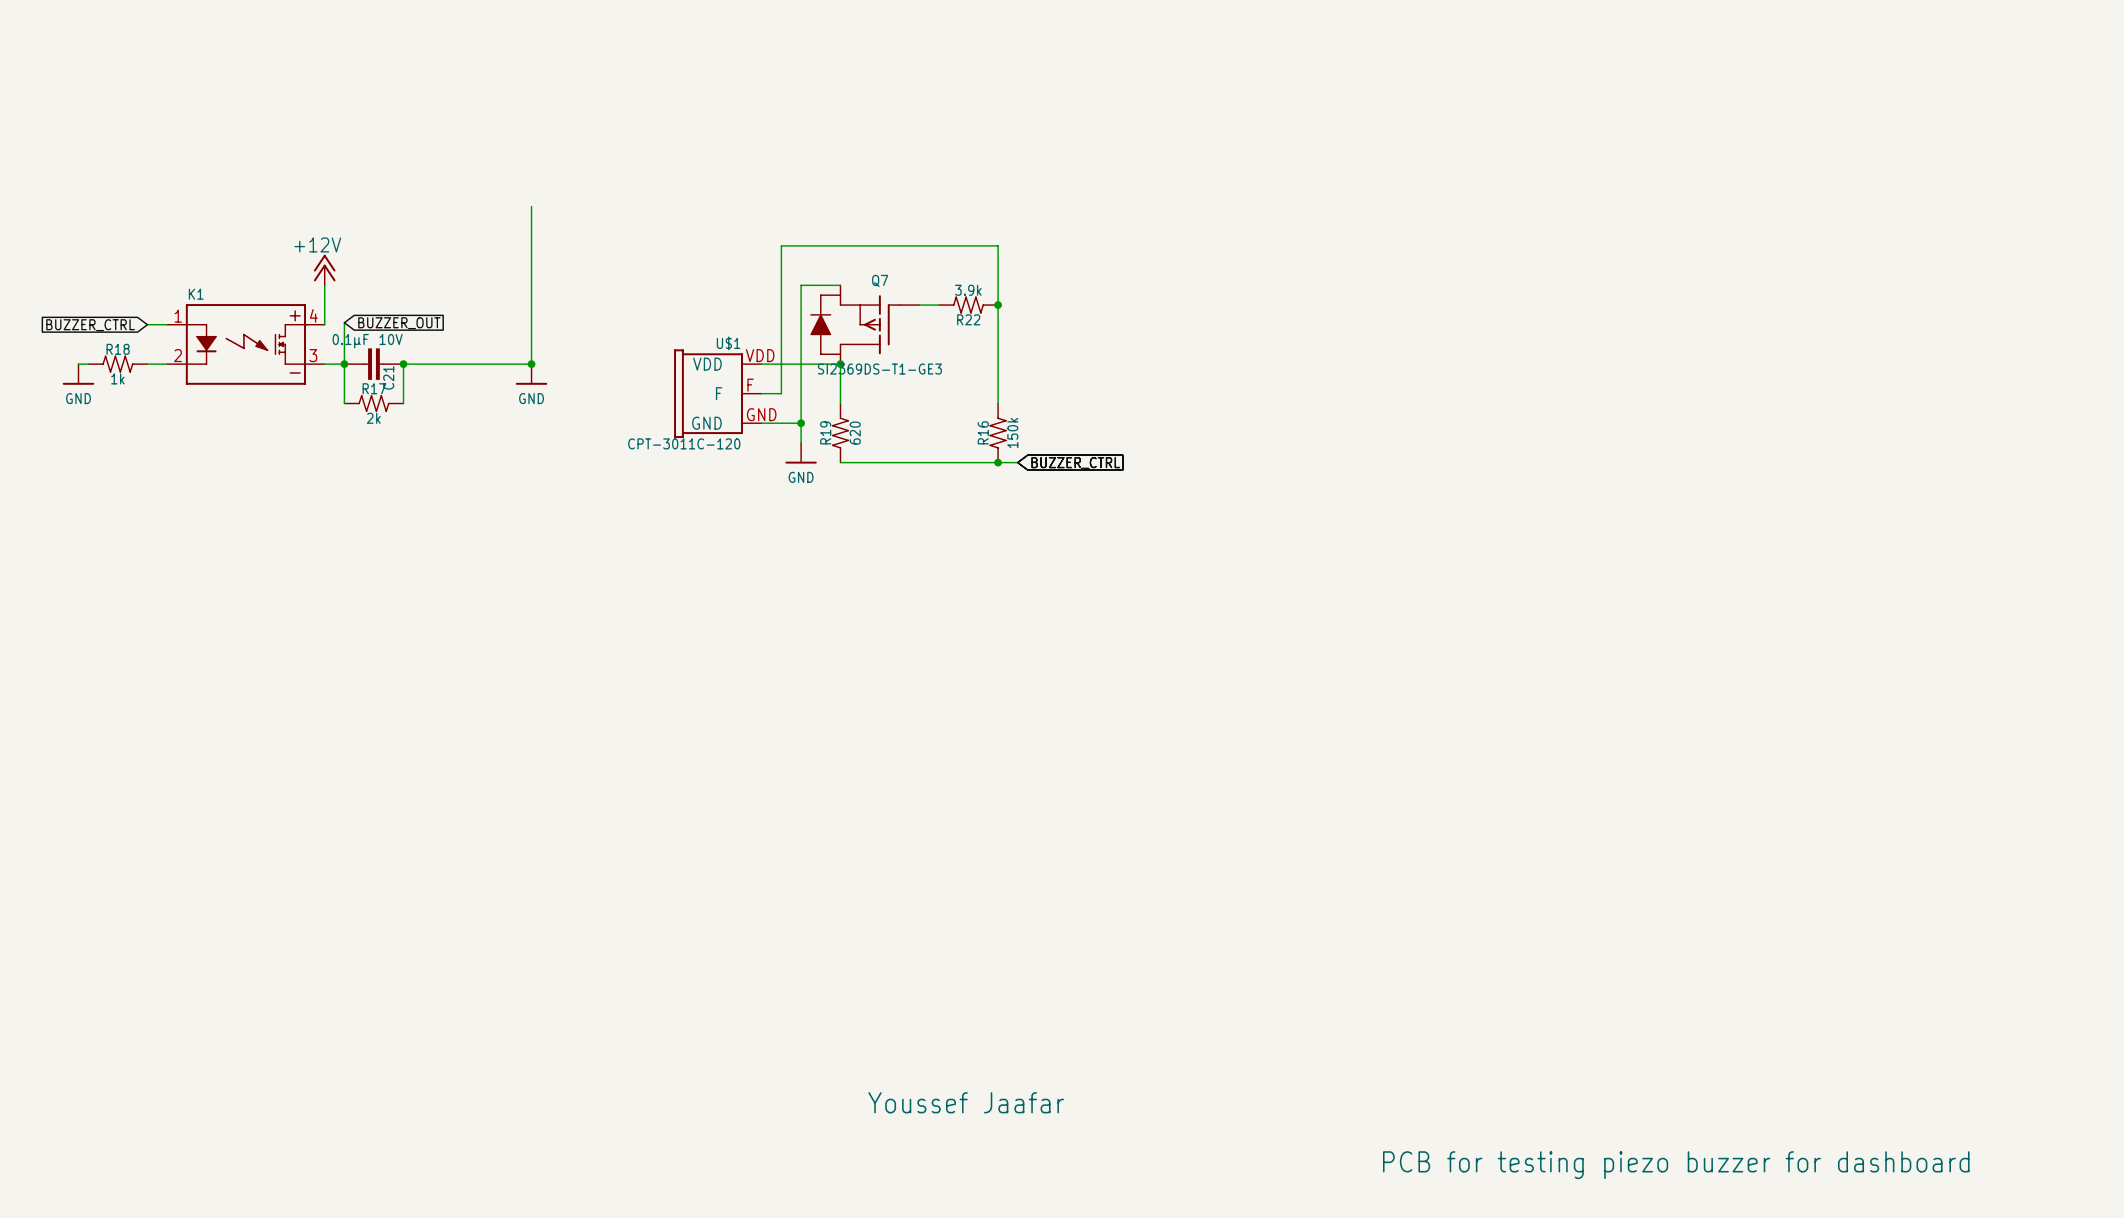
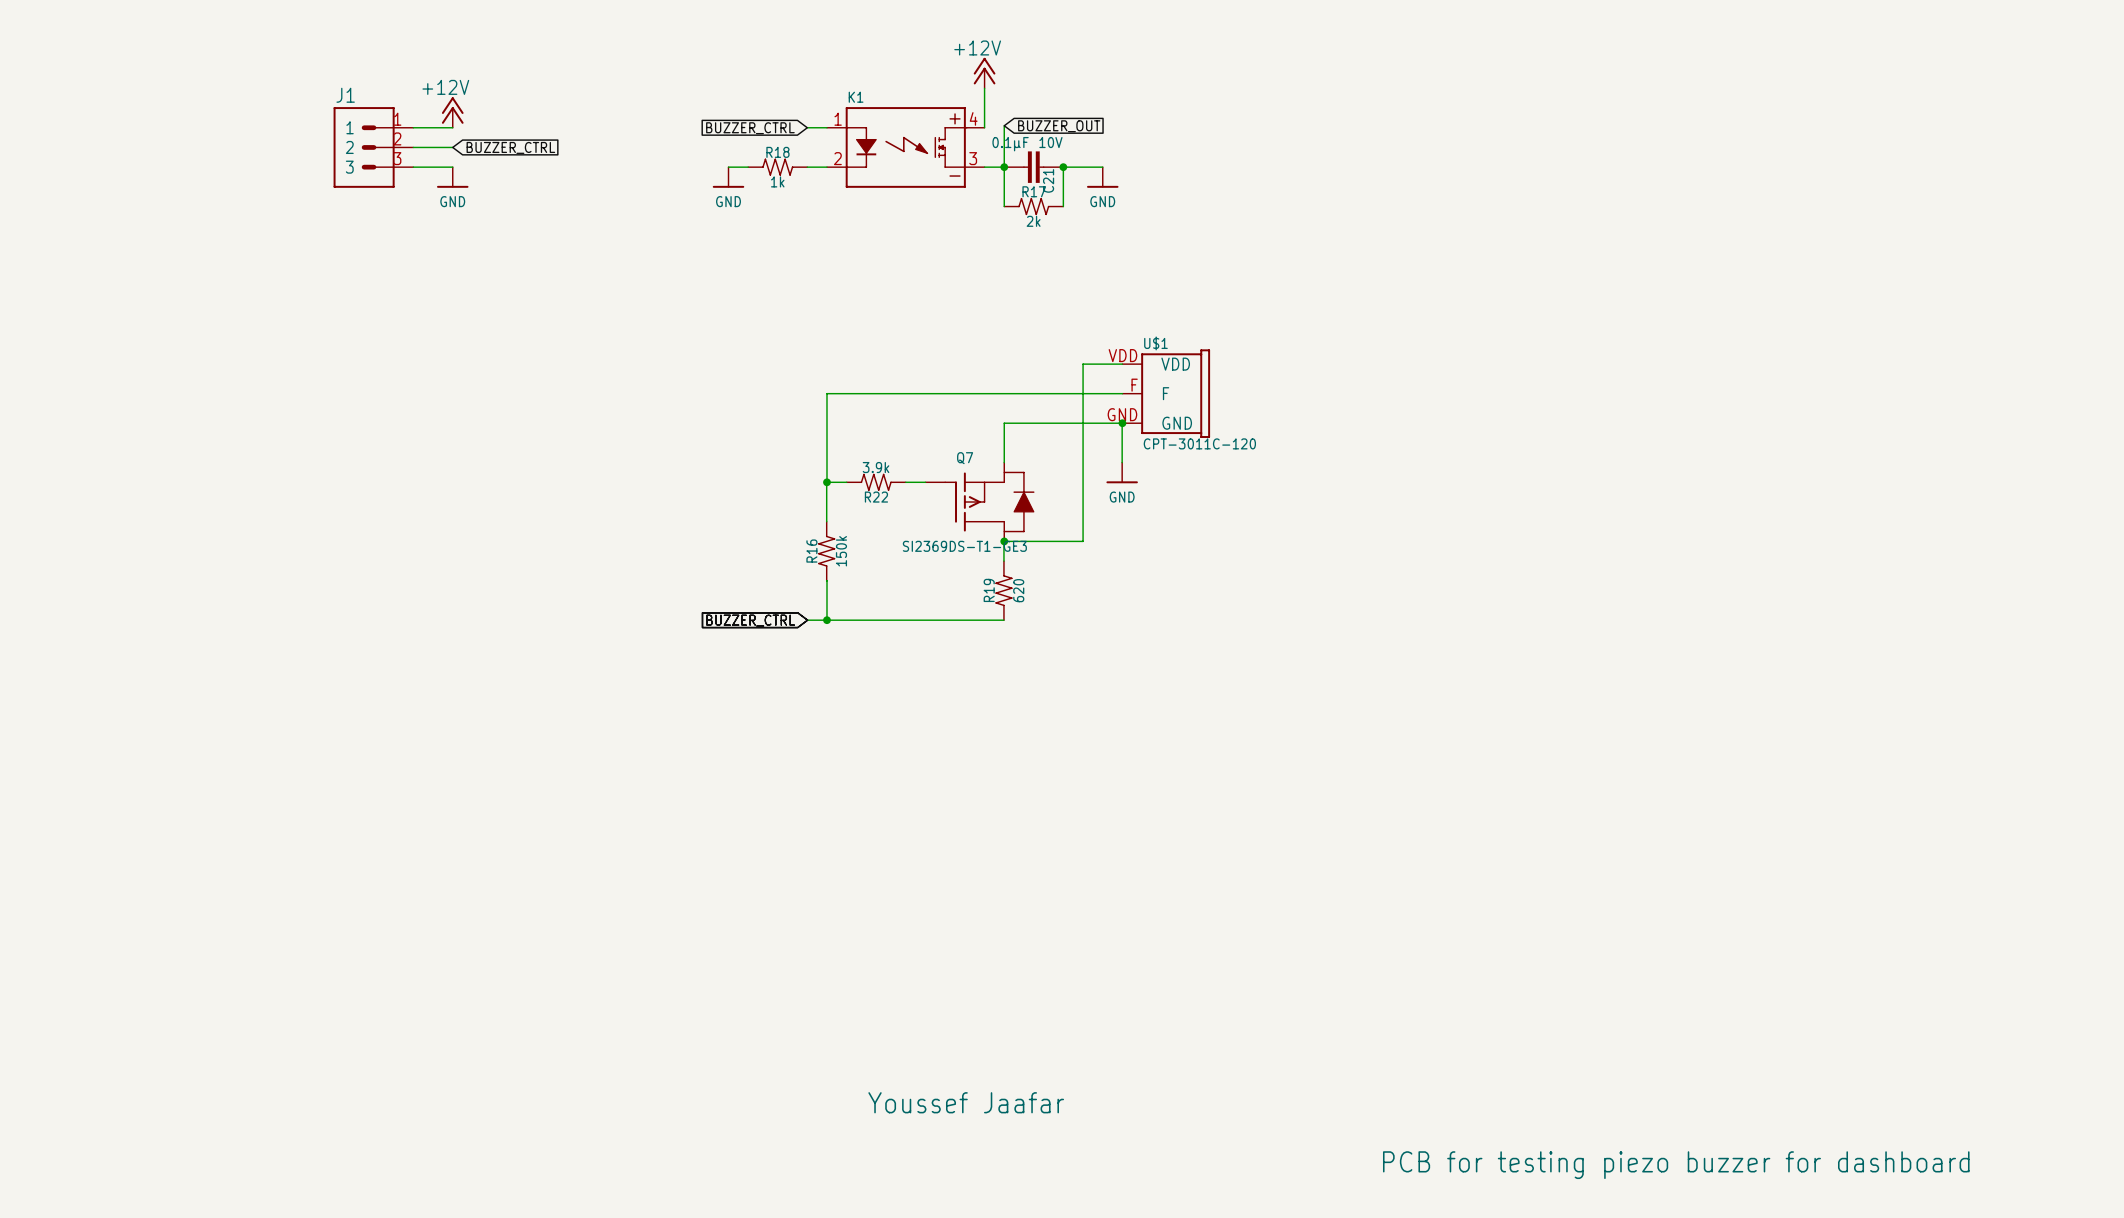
power symbol: none -> +12V (984, 73)
wire: none -> (984, 88) (984, 127)
power symbol: none -> +12V (452, 112)
wire: none -> (1004, 125) (1004, 206)
global label: none -> BUZZER_OUT (1059, 126)
wire: none -> (413, 127) (452, 127)
wire: none -> (807, 127) (826, 127)
global label: none -> BUZZER_CTRL (750, 128)
J1: none -> (373, 147)
wire: none -> (413, 147) (452, 147)
global label: none -> BUZZER_CTRL (510, 147)
wire: none -> (413, 167) (452, 167)
wire: none -> (728, 167) (748, 167)
wire: none -> (807, 167) (826, 167)
junction: none -> (1004, 167)
junction: none -> (1063, 167)
wire: none -> (1102, 167) (1063, 167) (1063, 206)
power symbol: none -> GND (452, 177)
power symbol: none -> GND (728, 177)
power symbol: none -> GND (1102, 177)
wire: (531, 206) (531, 364) (403, 364) (403, 403) -> none
power symbol: +12V (324, 270) -> none
wire: (324, 285) (324, 324) -> none
wire: (840, 285) (801, 285) (801, 442) -> none
wire: (919, 305) (938, 305) -> (984, 167) (1004, 167)
R22 position: (968, 305) -> (876, 482)
junction: (998, 305) -> none
wire: (344, 322) (344, 403) -> none
global label: BUZZER_OUT (399, 323) -> none
wire: (147, 324) (167, 324) -> none
Q7 flip: as is (855, 324) -> left-right (989, 502)
Q7 position: (864, 324) -> (979, 502)
global label: BUZZER_CTRL (90, 325) -> none
K1 position: (245, 344) -> (905, 147)
wire: (78, 364) (88, 364) -> none
R18 position: (117, 364) -> (777, 167)
wire: (147, 364) (167, 364) -> none
wire: (324, 364) (344, 364) -> none
junction: (344, 364) -> none
C21 position: (373, 364) -> (1033, 167)
junction: (403, 364) -> none
junction: (531, 364) -> none
wire: (761, 364) (840, 364) (840, 403) -> none
junction: (840, 364) -> none
wire: none -> (1122, 364) (1083, 364) (1083, 541) (1003, 541) (1003, 561)
power symbol: GND (78, 374) -> none
power symbol: GND (531, 374) -> none
U$1 flip: as is (708, 393) -> left-right (1175, 393)
U$1 position: (717, 393) -> (1166, 393)
wire: (761, 393) (781, 393) (781, 245) (998, 245) (998, 403) -> none
wire: none -> (1122, 393) (826, 393) (826, 482)
R17 position: (373, 403) -> (1033, 206)
wire: (761, 423) (801, 423) -> none
junction: (801, 423) -> none
wire: none -> (1122, 423) (1122, 462)
wire: none -> (1122, 423) (1004, 423) (1004, 462)
junction: none -> (1122, 423)
R19 position: (840, 433) -> (1003, 590)
R16 position: (998, 433) -> (826, 551)
power symbol: GND (801, 453) -> none
wire: (840, 462) (1017, 462) -> none
junction: (998, 462) -> none
global label: BUZZER_CTRL (1075, 463) -> none
power symbol: none -> GND (1122, 472)
junction: none -> (826, 482)
wire: none -> (846, 482) (826, 482) (826, 521)
wire: none -> (905, 482) (925, 482)
junction: none -> (1004, 541)
wire: none -> (826, 580) (826, 620)
global label: none -> BUZZER_CTRL (750, 620)
wire: none -> (807, 620) (1003, 620)
junction: none -> (826, 620)

